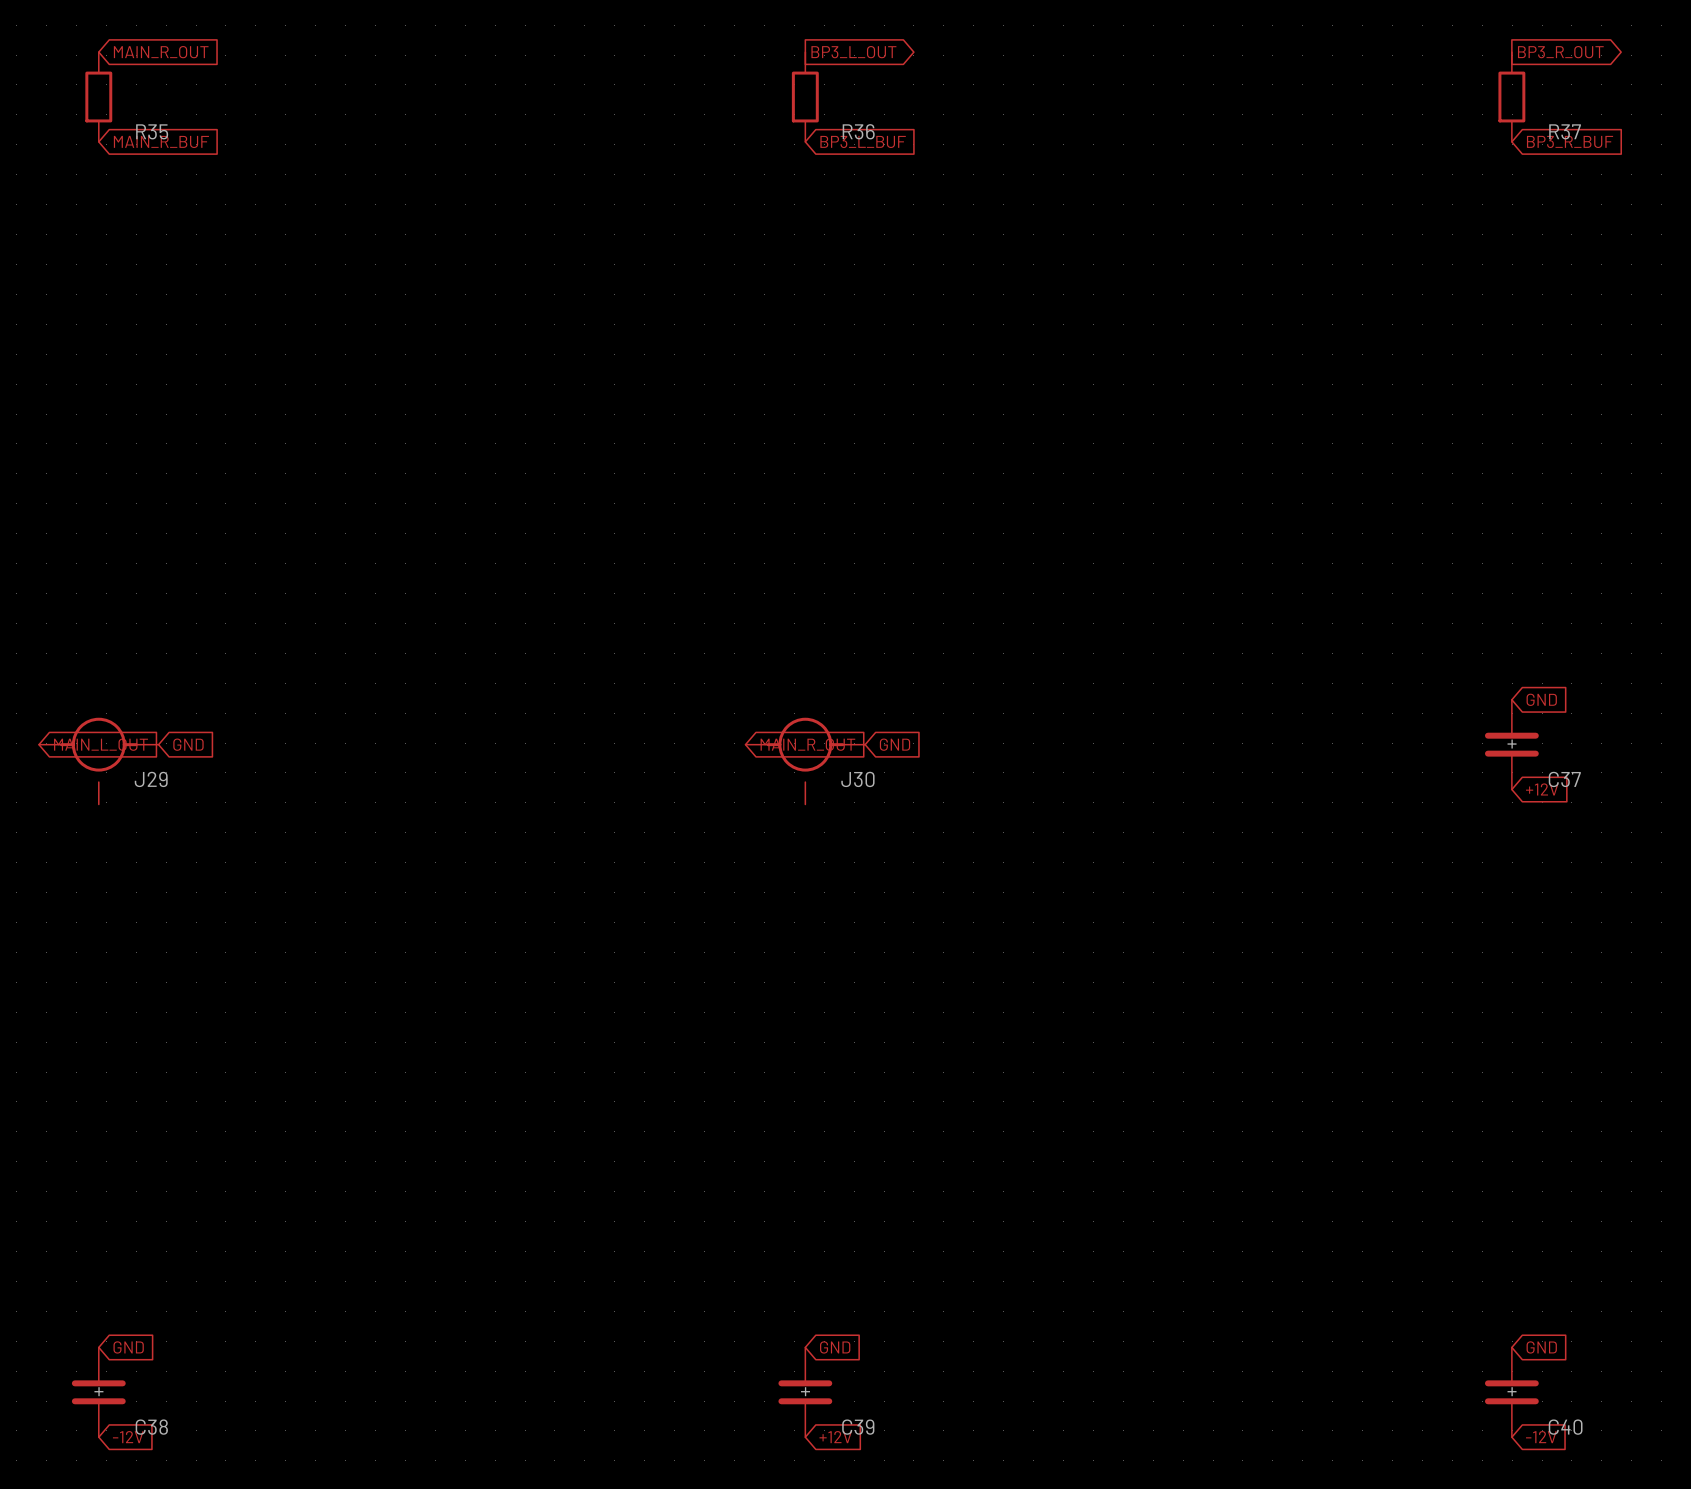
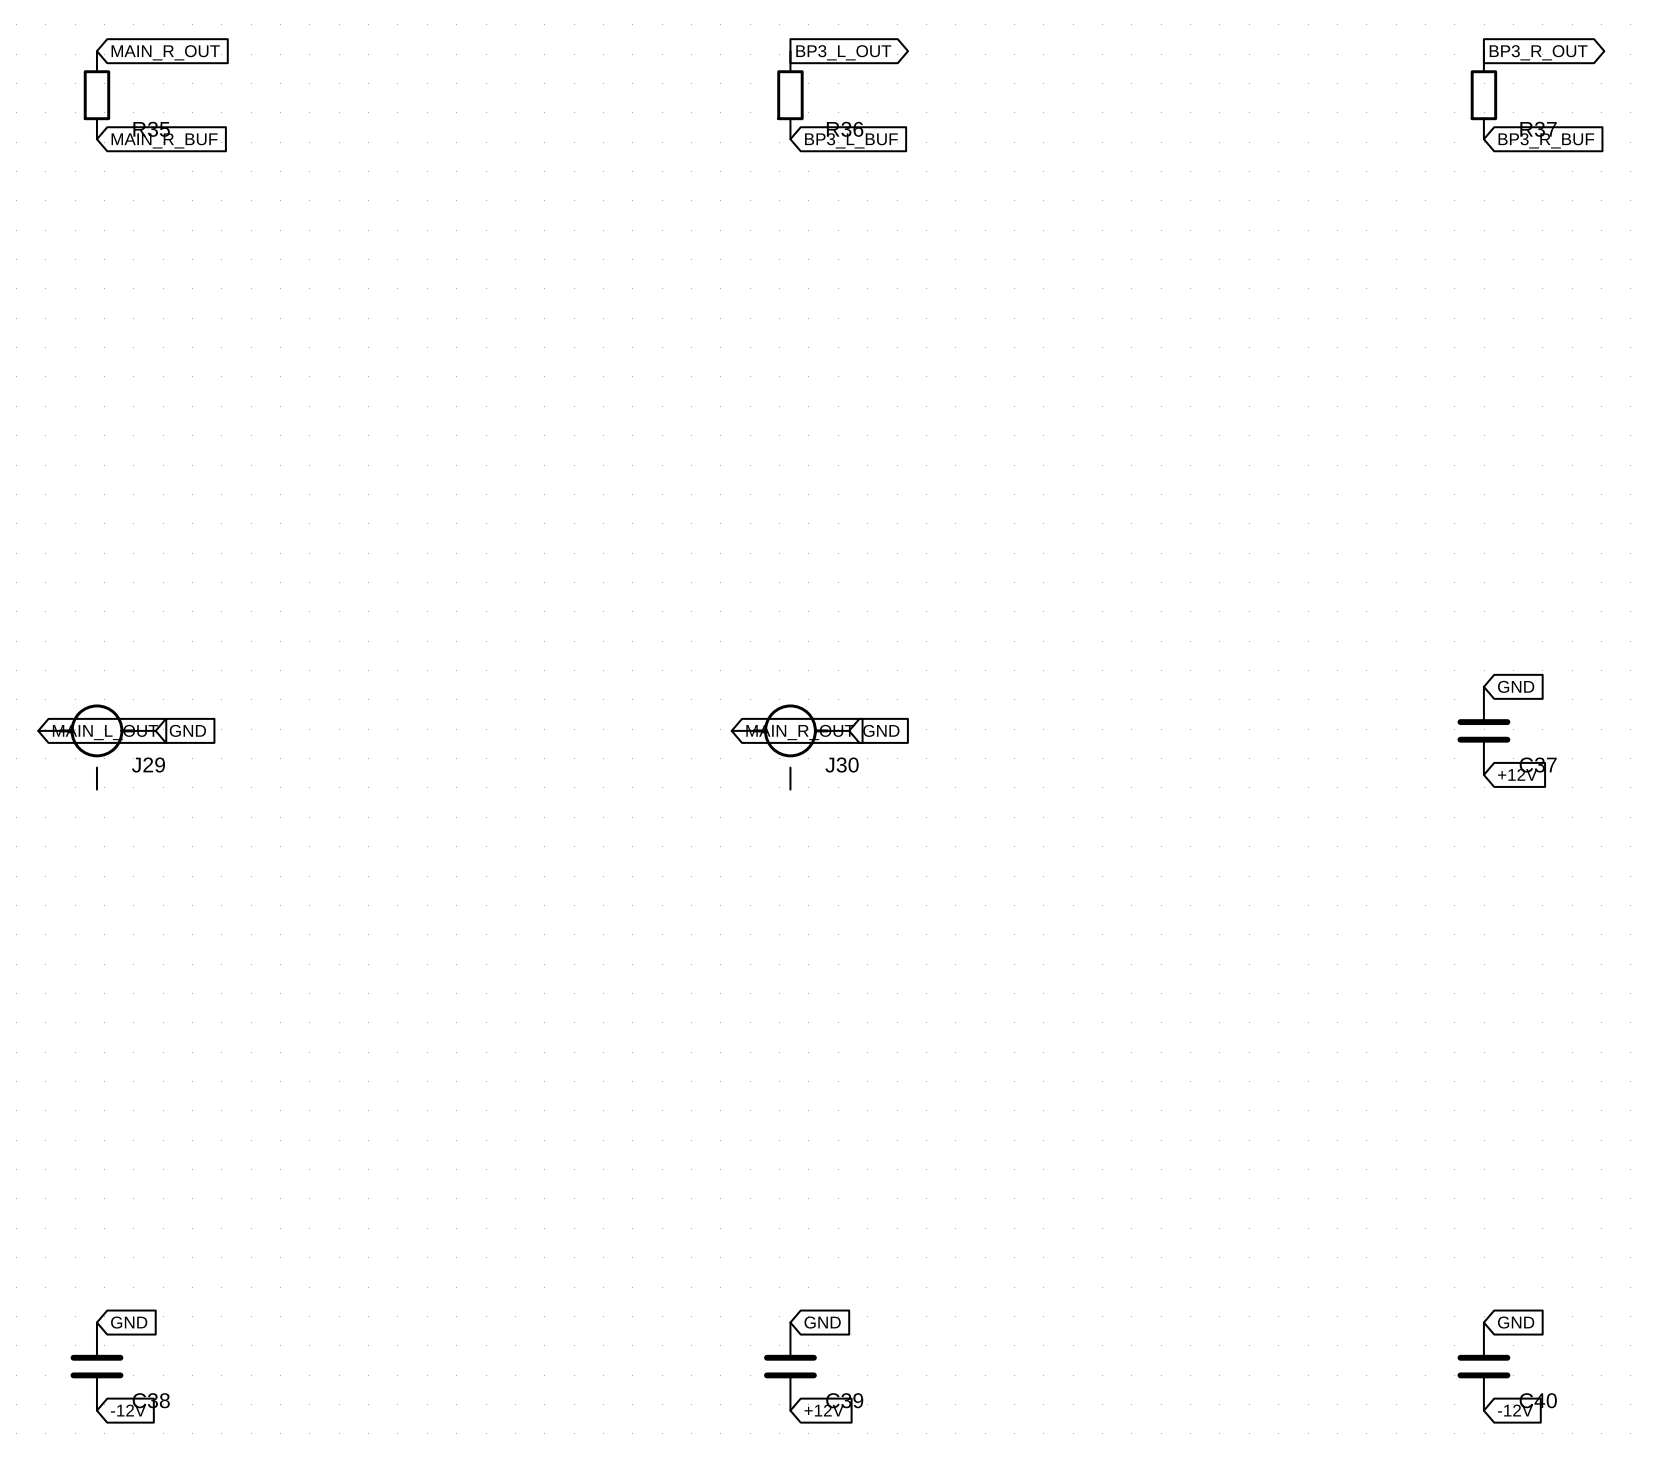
C37 pin name: + (1512, 744) -> none
C38 pin name: + (98, 1391) -> none
C39 pin name: + (805, 1391) -> none
C40 pin name: + (1512, 1391) -> none

